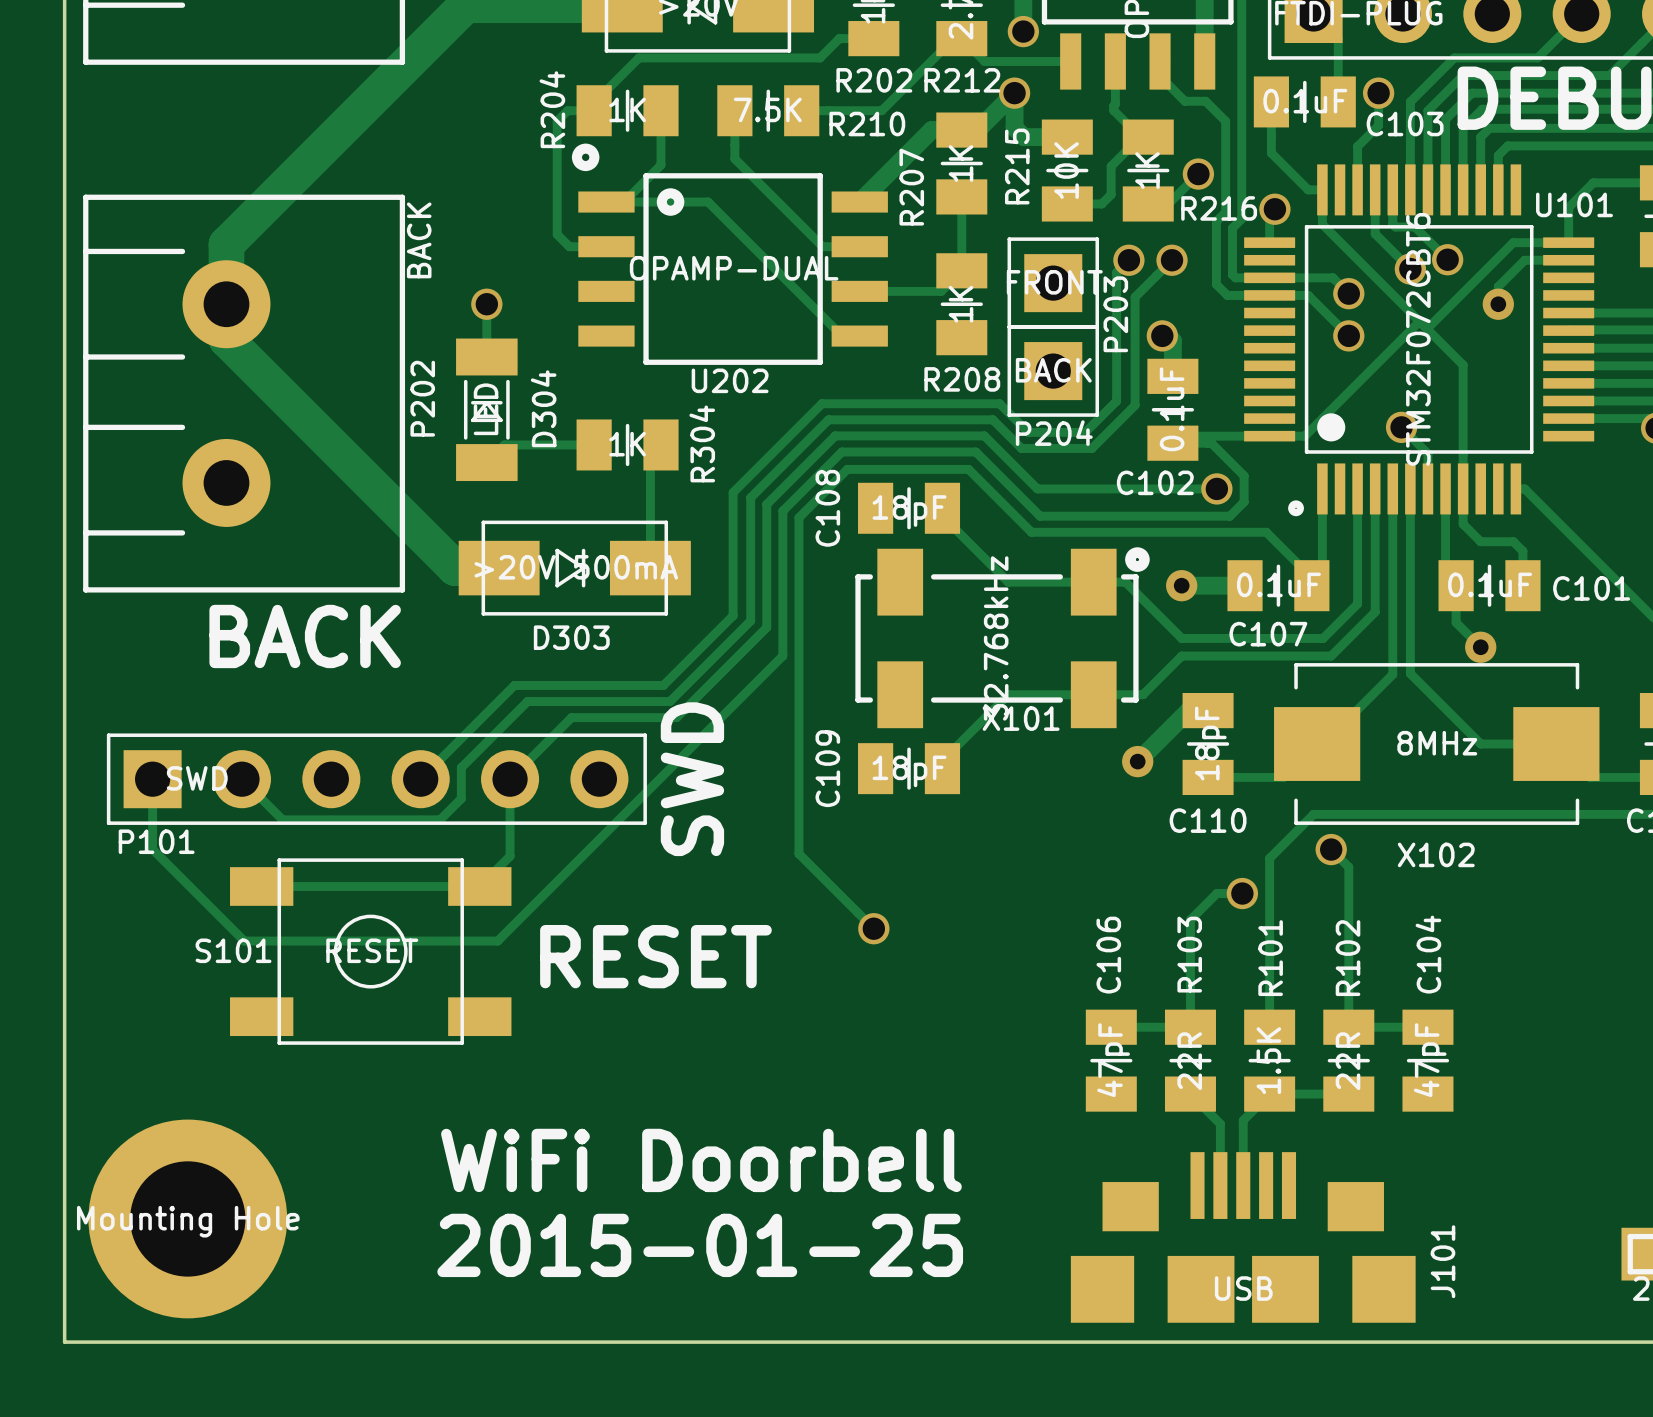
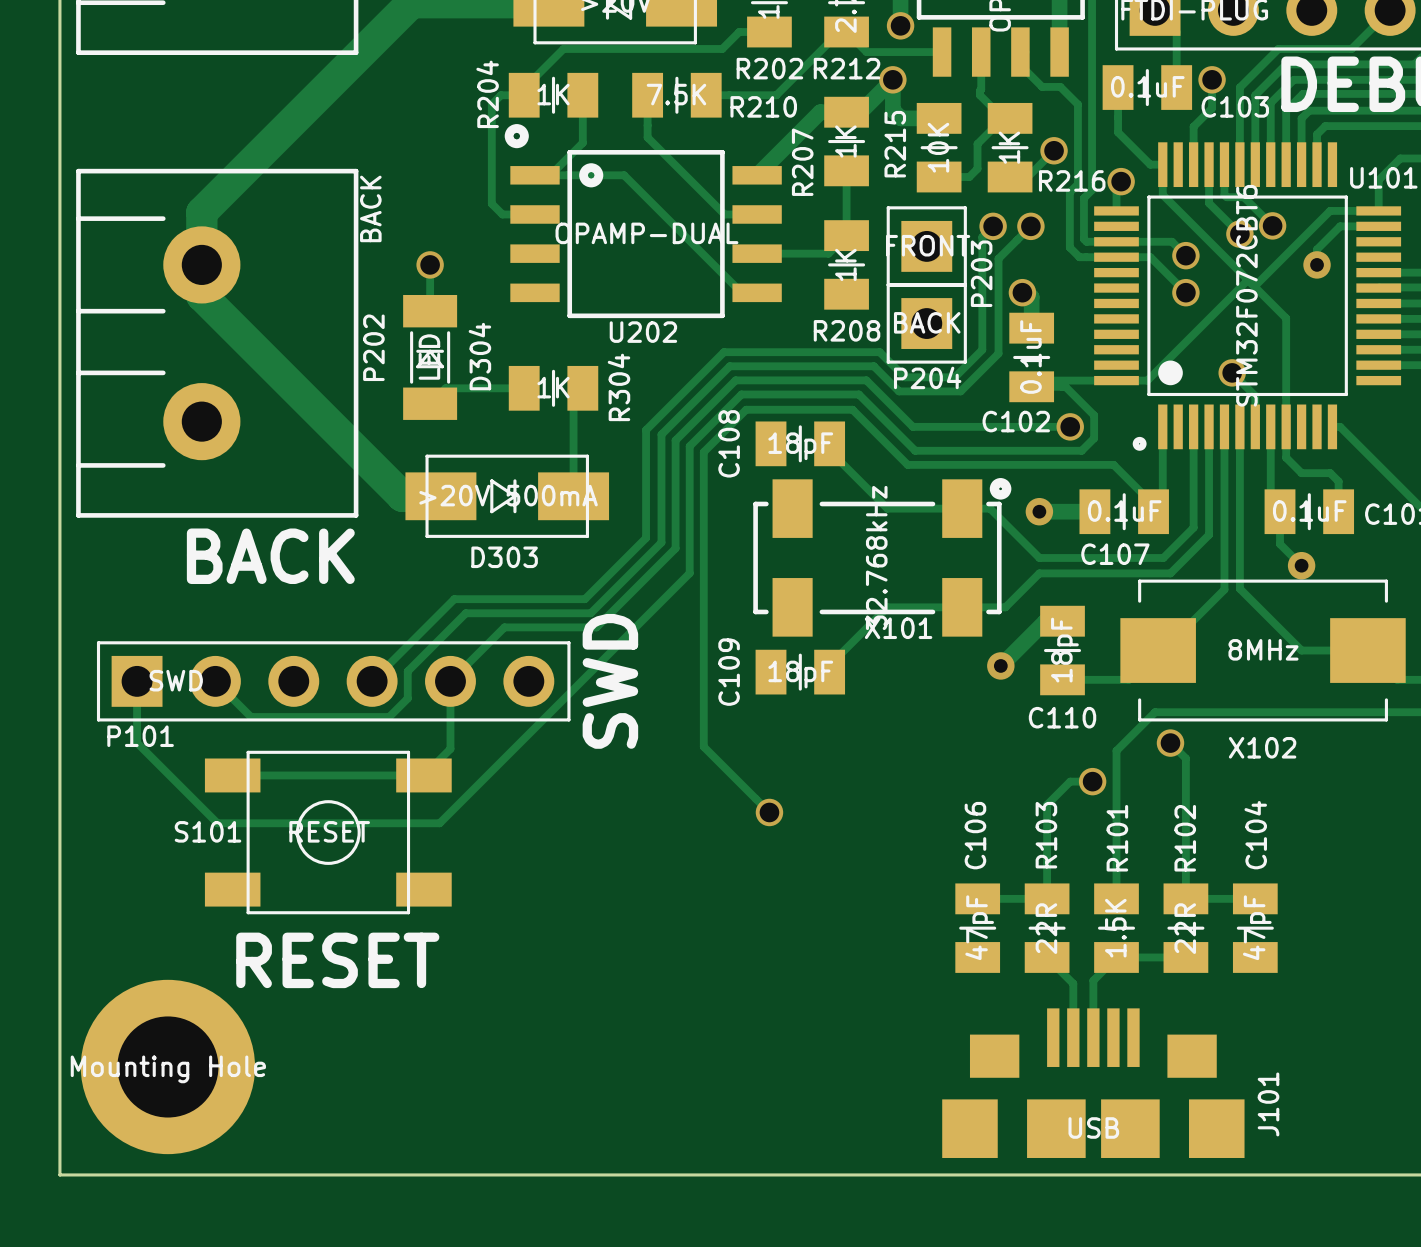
text position: RESET (655, 956) -> RESET (337, 960)
text: WiFi Doorbell (701, 1160) -> none
text: 2015-01-25 (700, 1245) -> none

